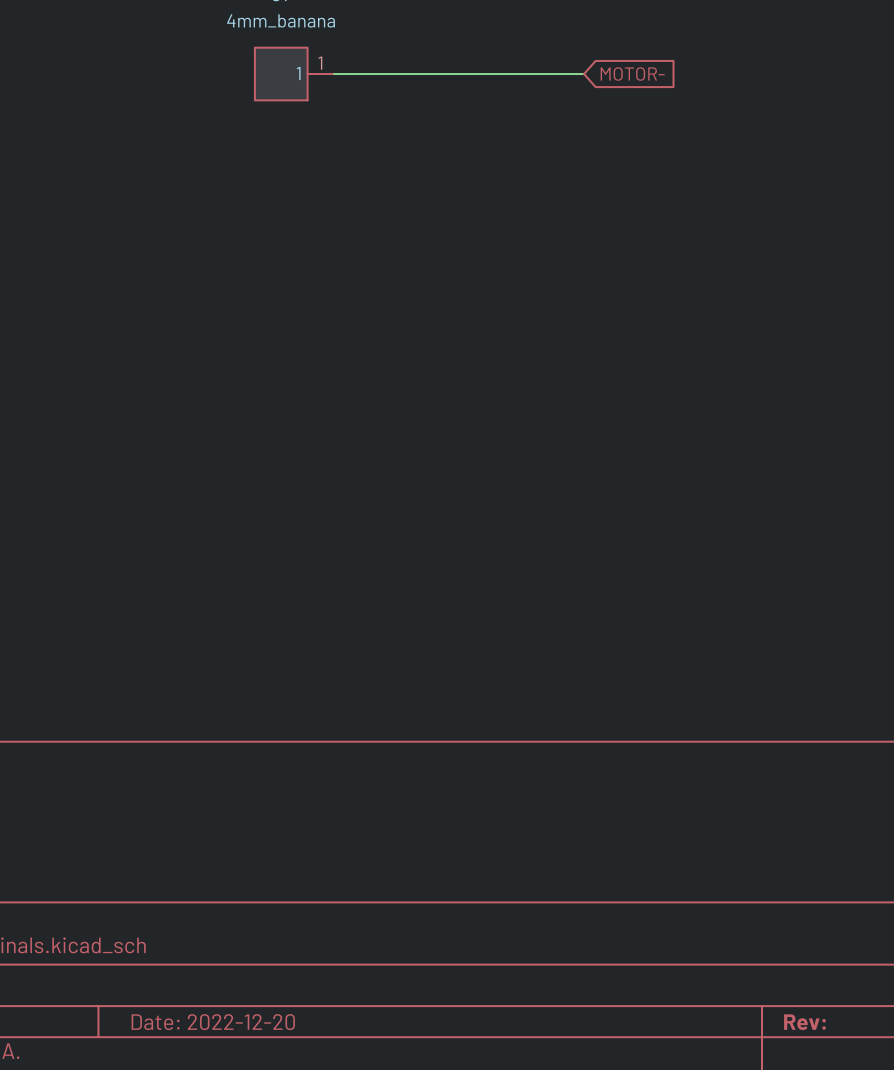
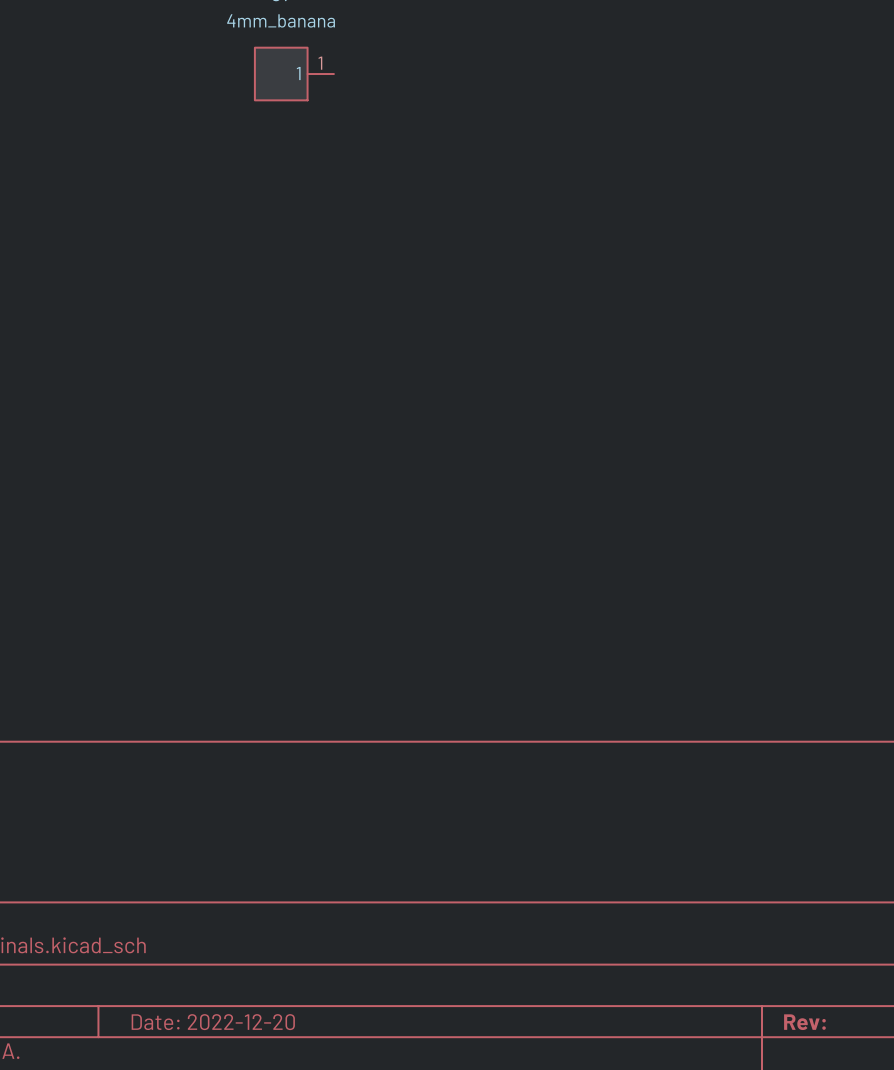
wire: (333, 74) (584, 74) -> none
global label: MOTOR- (632, 74) -> none

